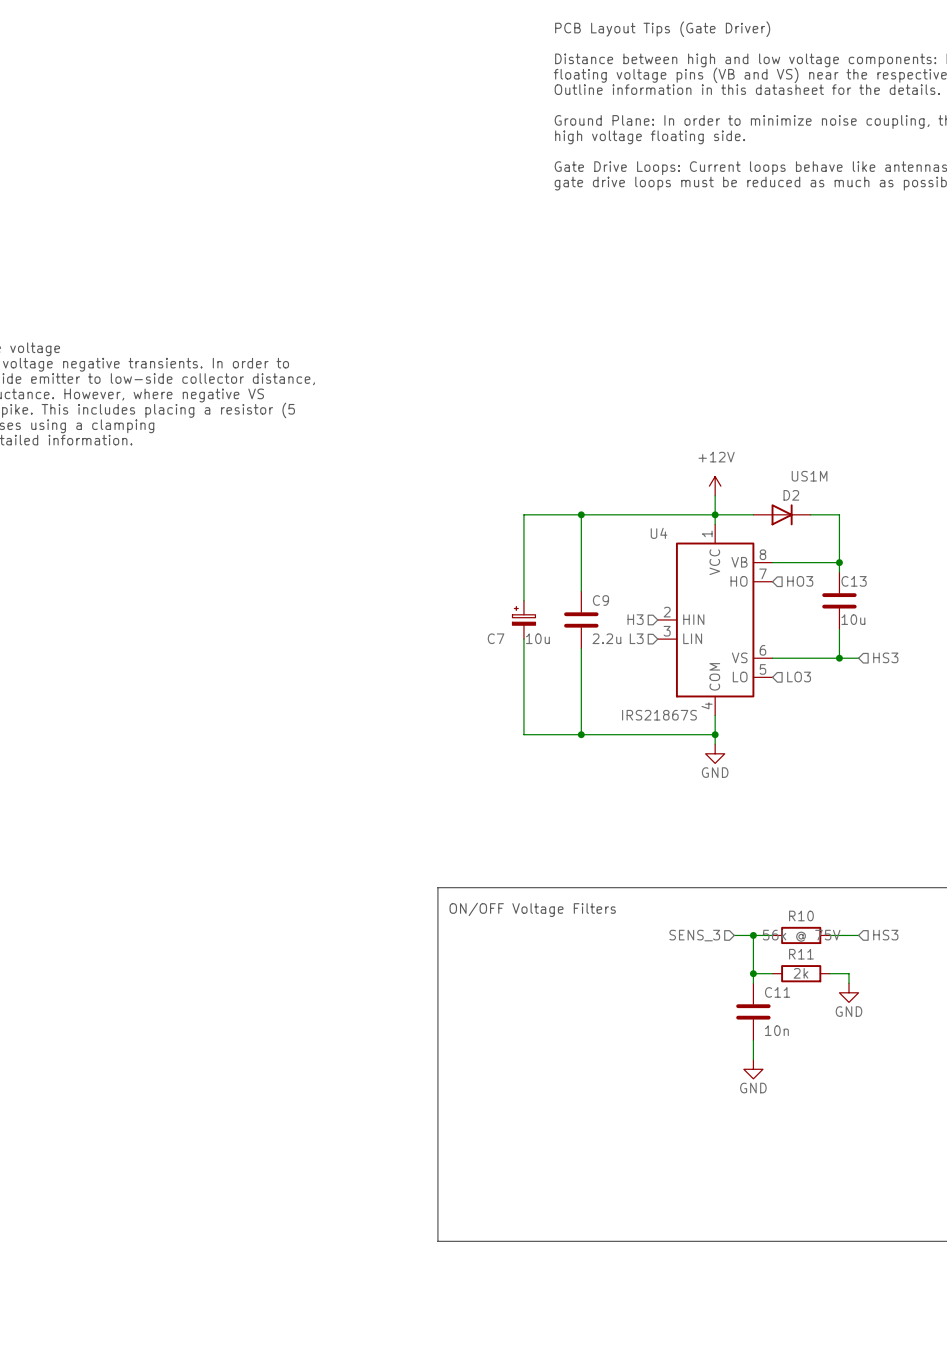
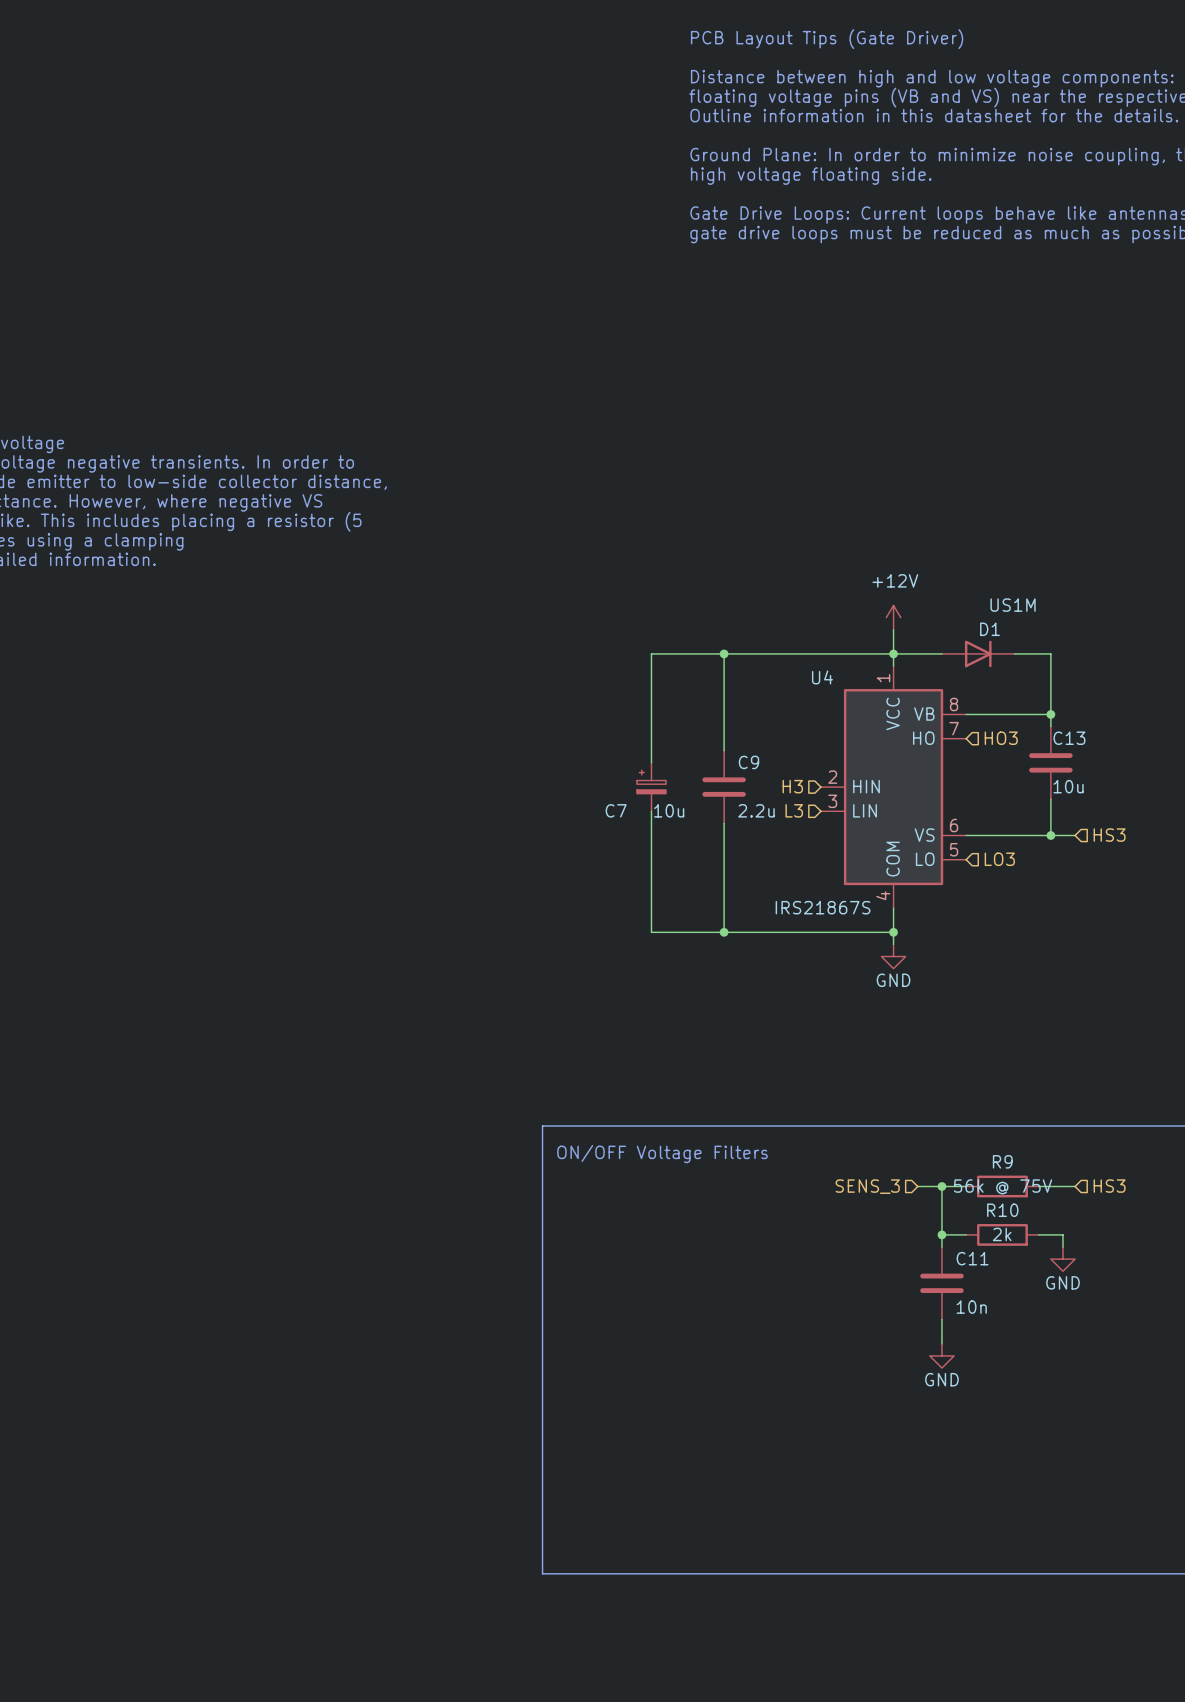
D2 name: D2 (791, 495) -> D1 (989, 629)
R10 name: R10 (801, 915) -> R9 (1002, 1161)
R11 name: R11 (801, 954) -> R10 (1002, 1210)

